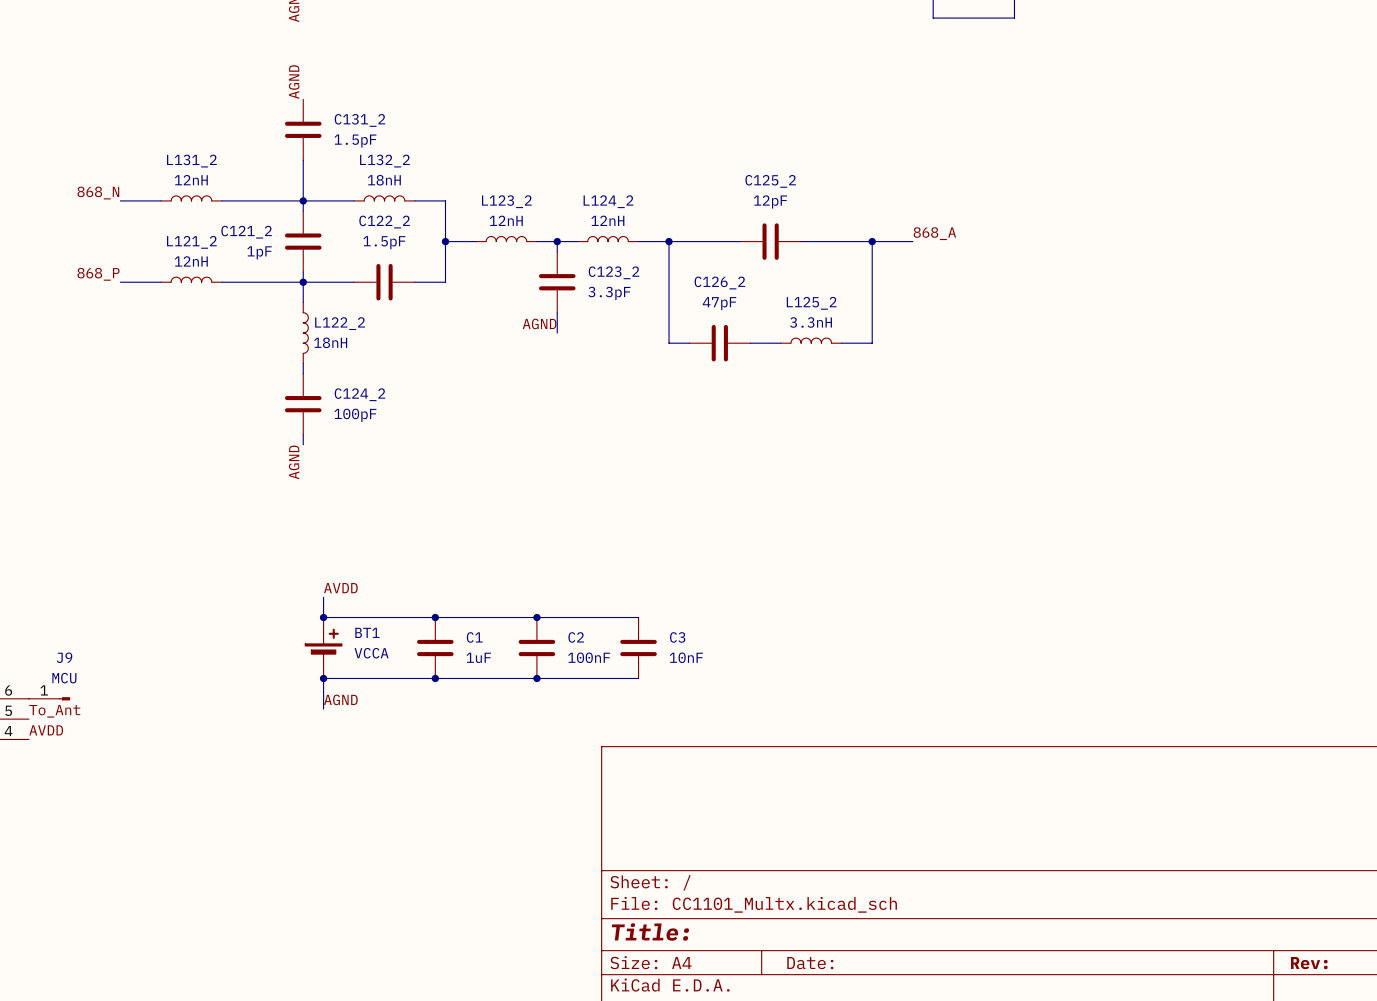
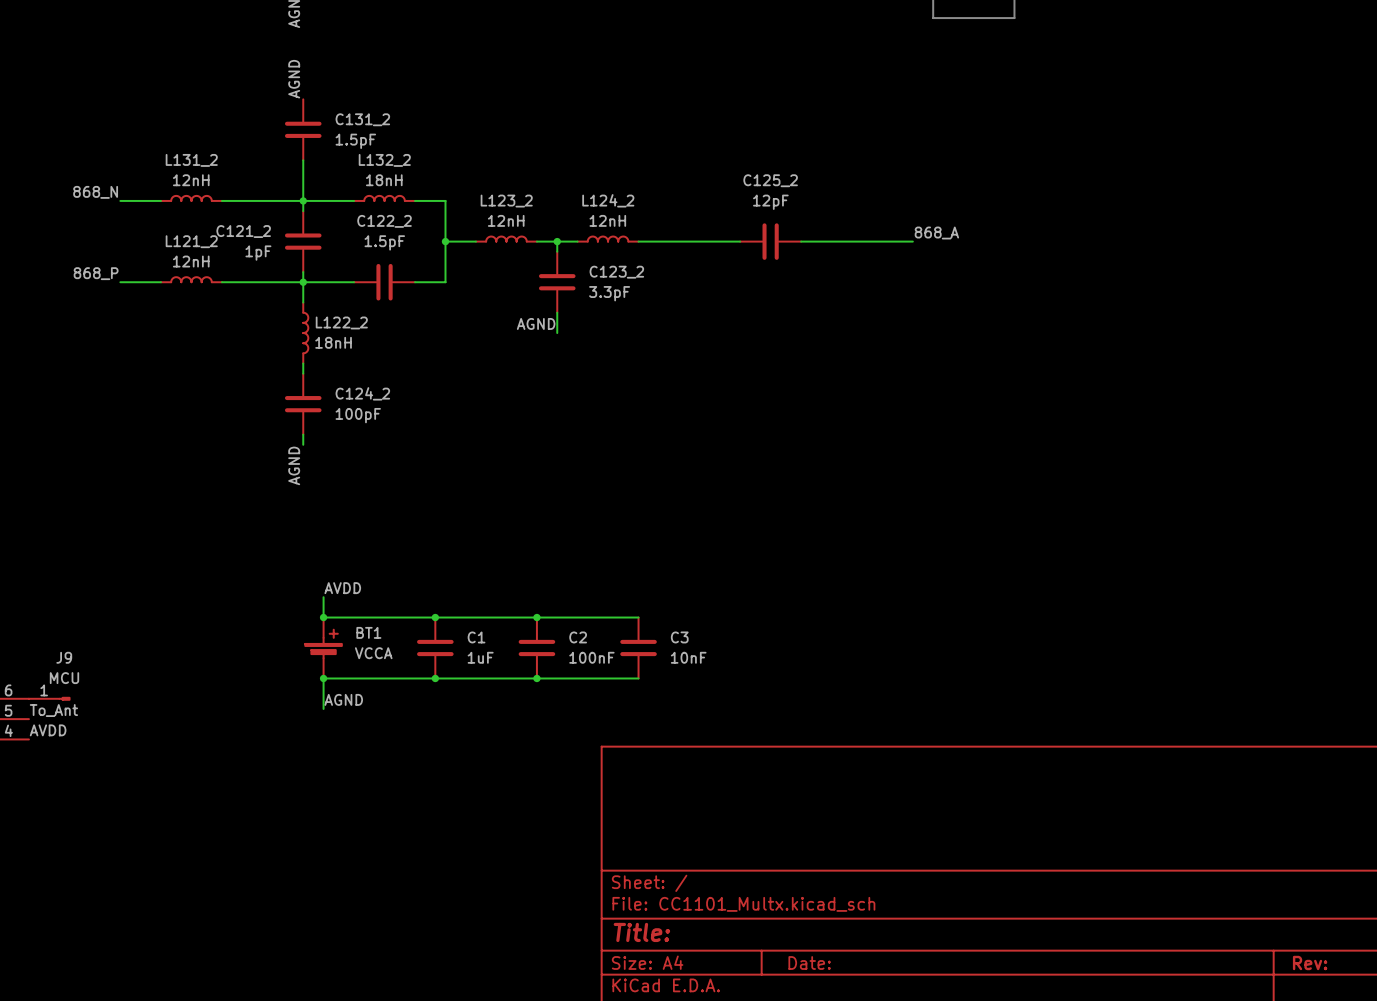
wire: (669, 241) (669, 343) (689, 343) -> none
junction: (669, 241) -> none
wire: (872, 241) (872, 343) (841, 343) -> none
junction: (872, 241) -> none
L125_2: 3.3nH (811, 340) -> none
C126_2: 47pF (719, 343) -> none
wire: (750, 343) (780, 343) -> none

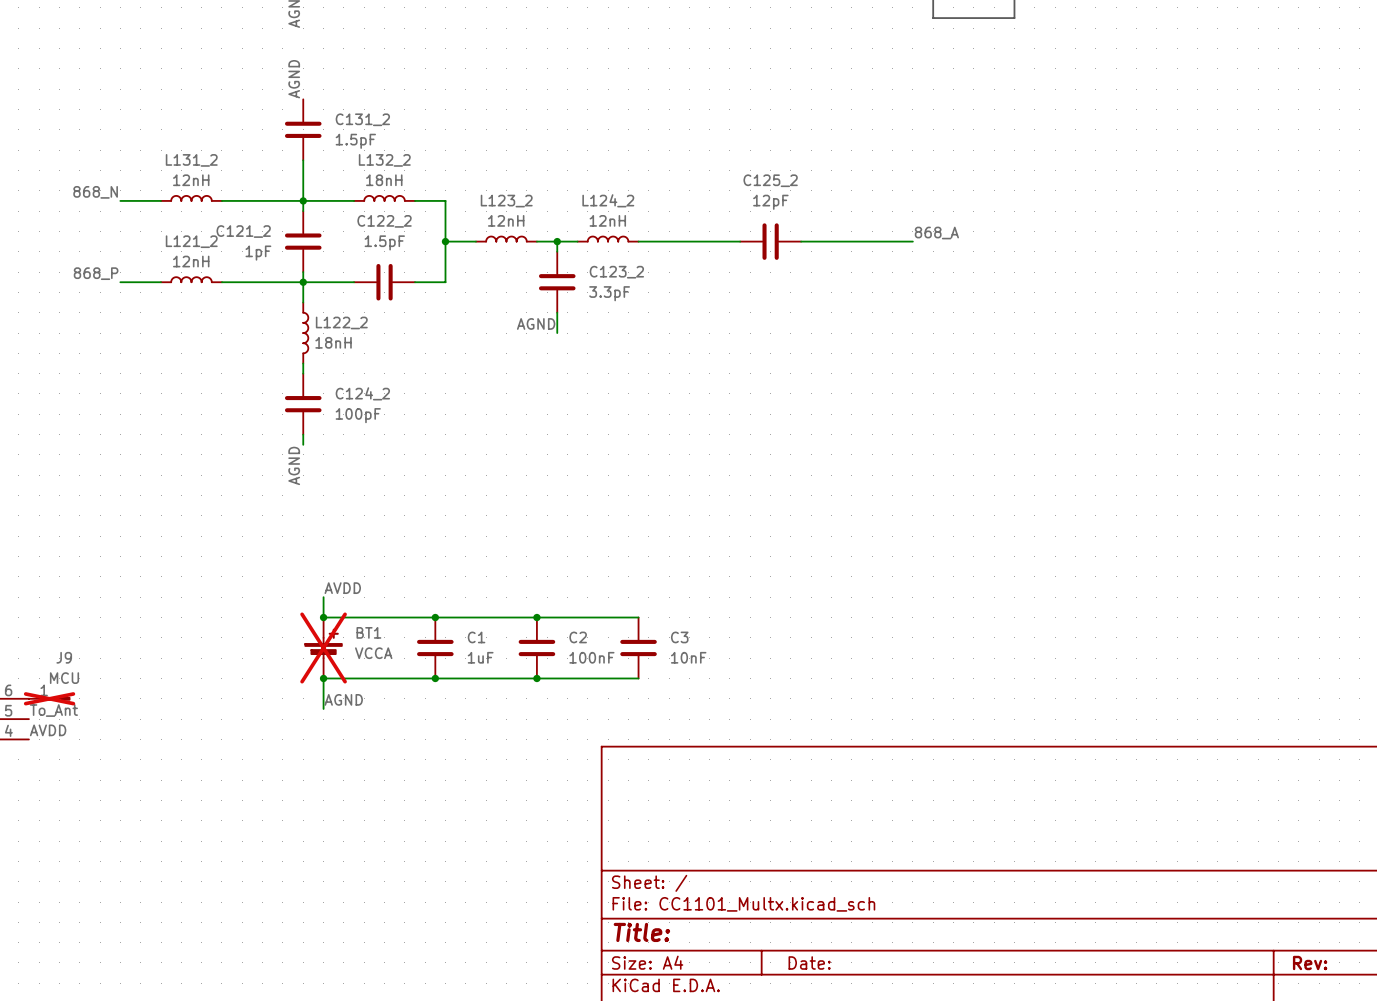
BT1 do-not-place cross: none -> (323, 648)
J9 do-not-place cross: none -> (49, 698)

